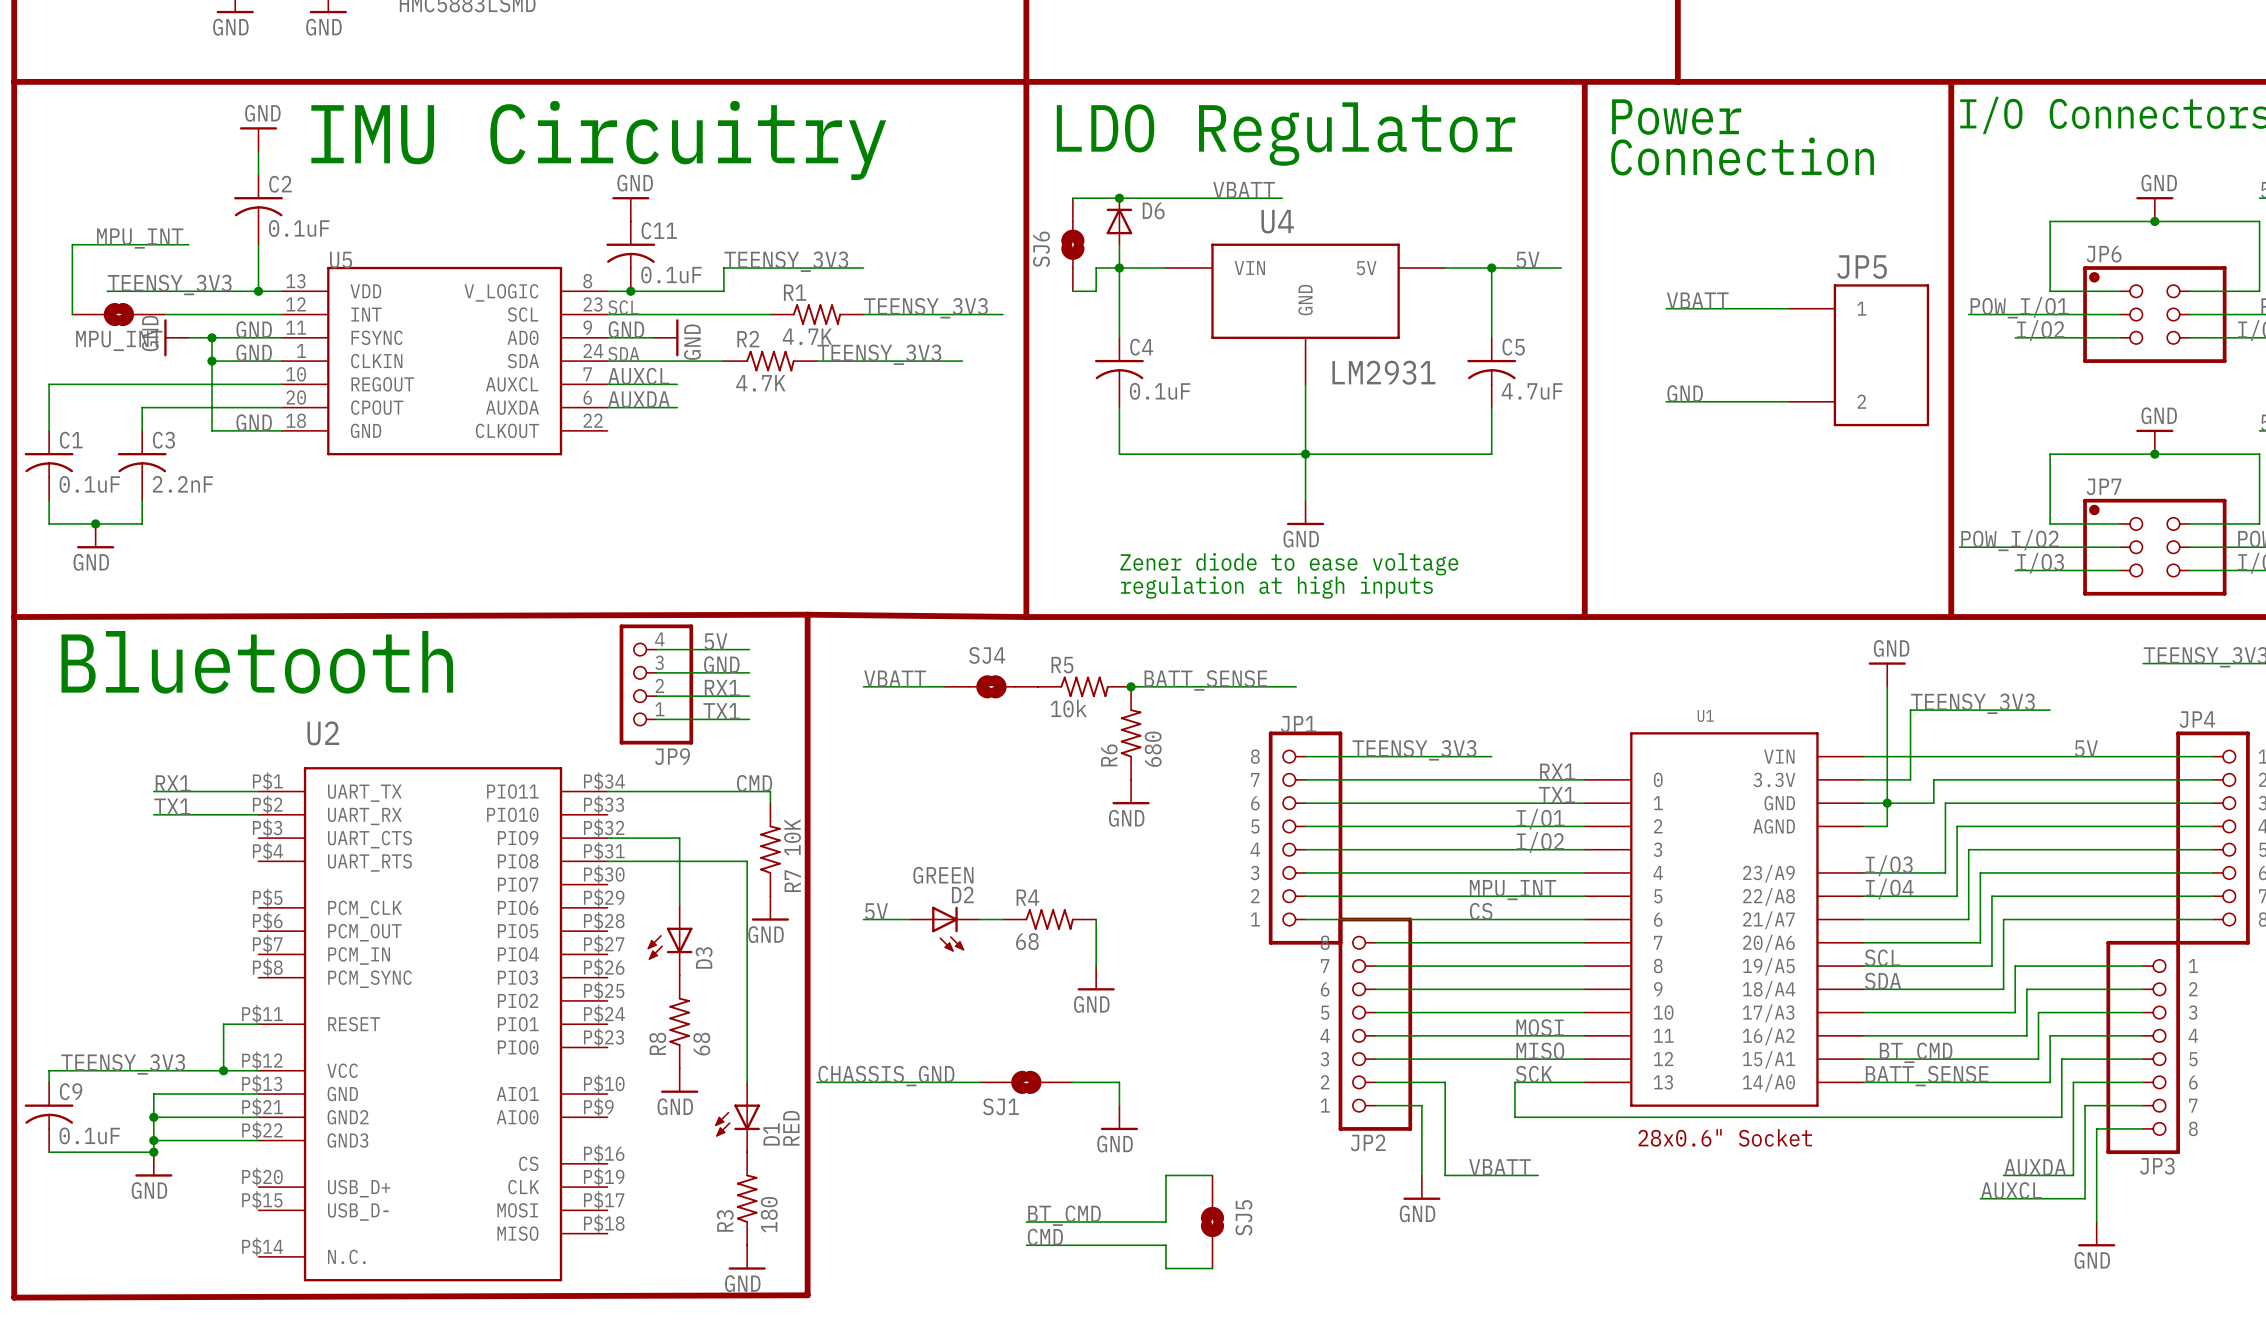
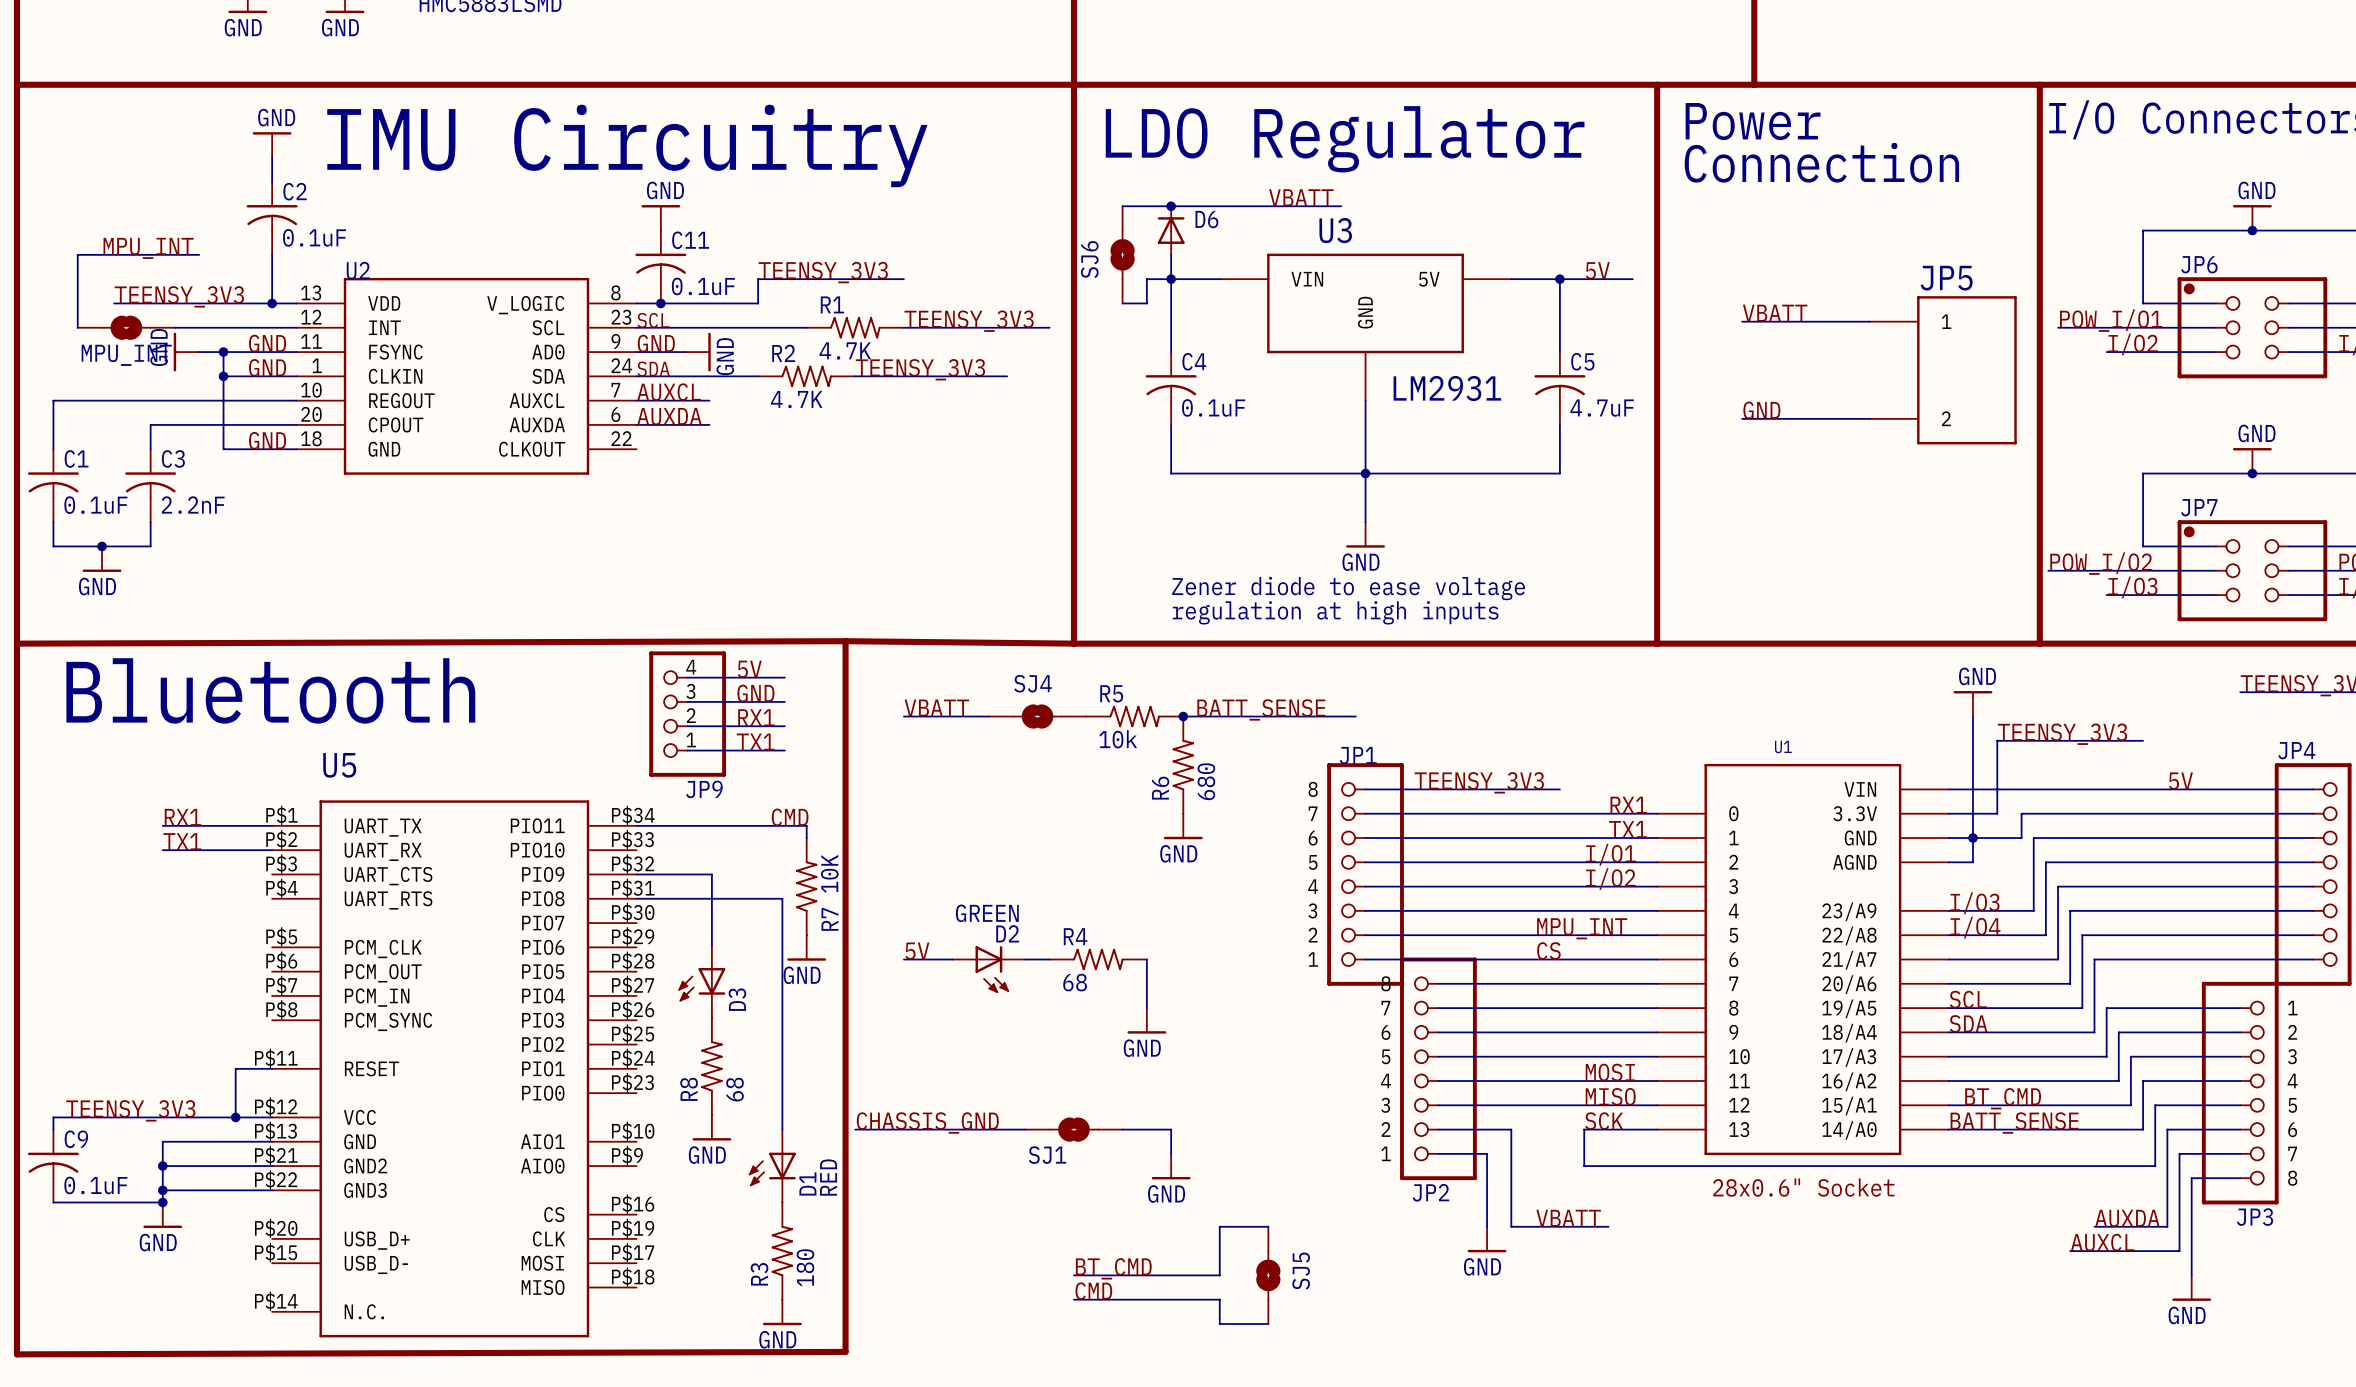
U4 name: U4 (1277, 221) -> U3 (1335, 230)
U5 name: U5 (341, 260) -> U2 (358, 270)
U2 name: U2 (323, 733) -> U5 (339, 765)

